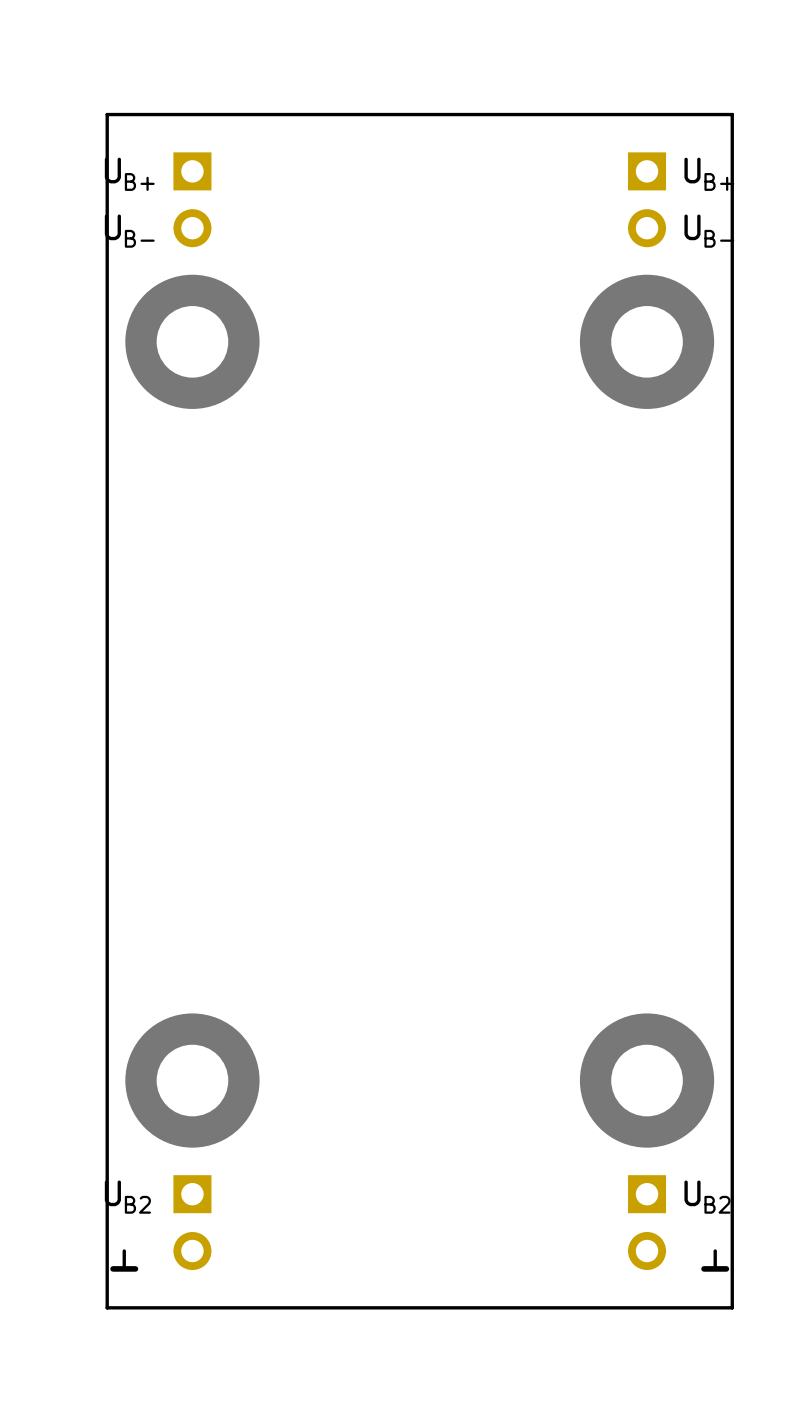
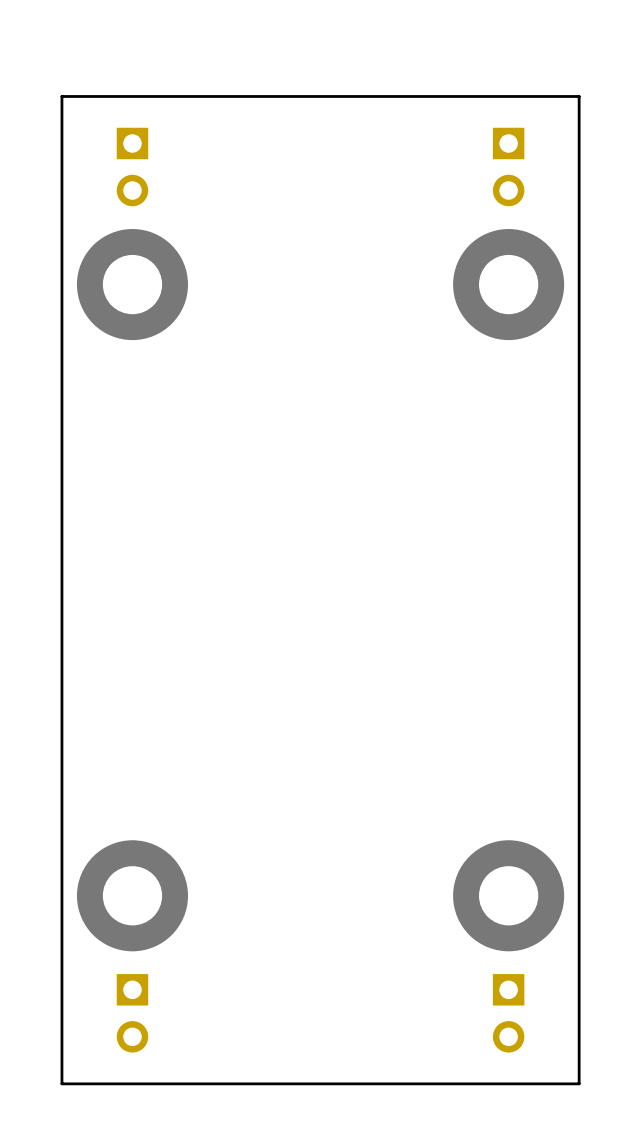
drawing: [104, 157, 155, 248] -> none
drawing: [684, 157, 735, 248] -> none
drawing: [104, 1180, 151, 1214] -> none
drawing: [684, 1180, 731, 1214] -> none
drawing: [110, 1249, 139, 1272] -> none
drawing: [701, 1249, 730, 1272] -> none

